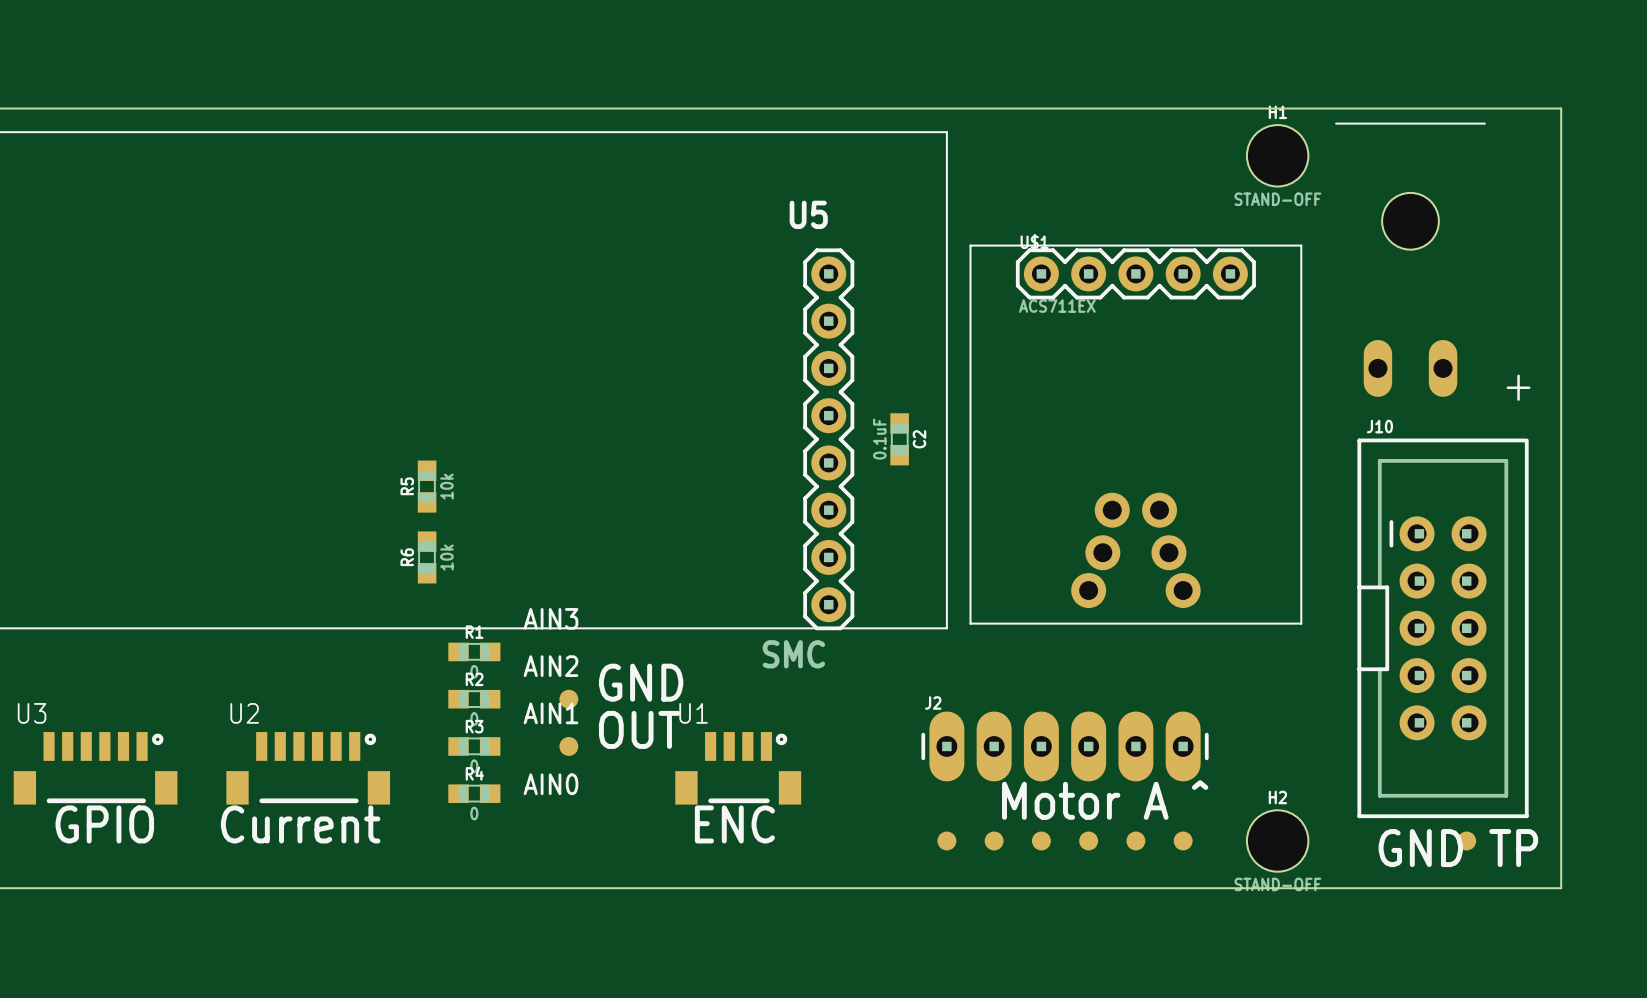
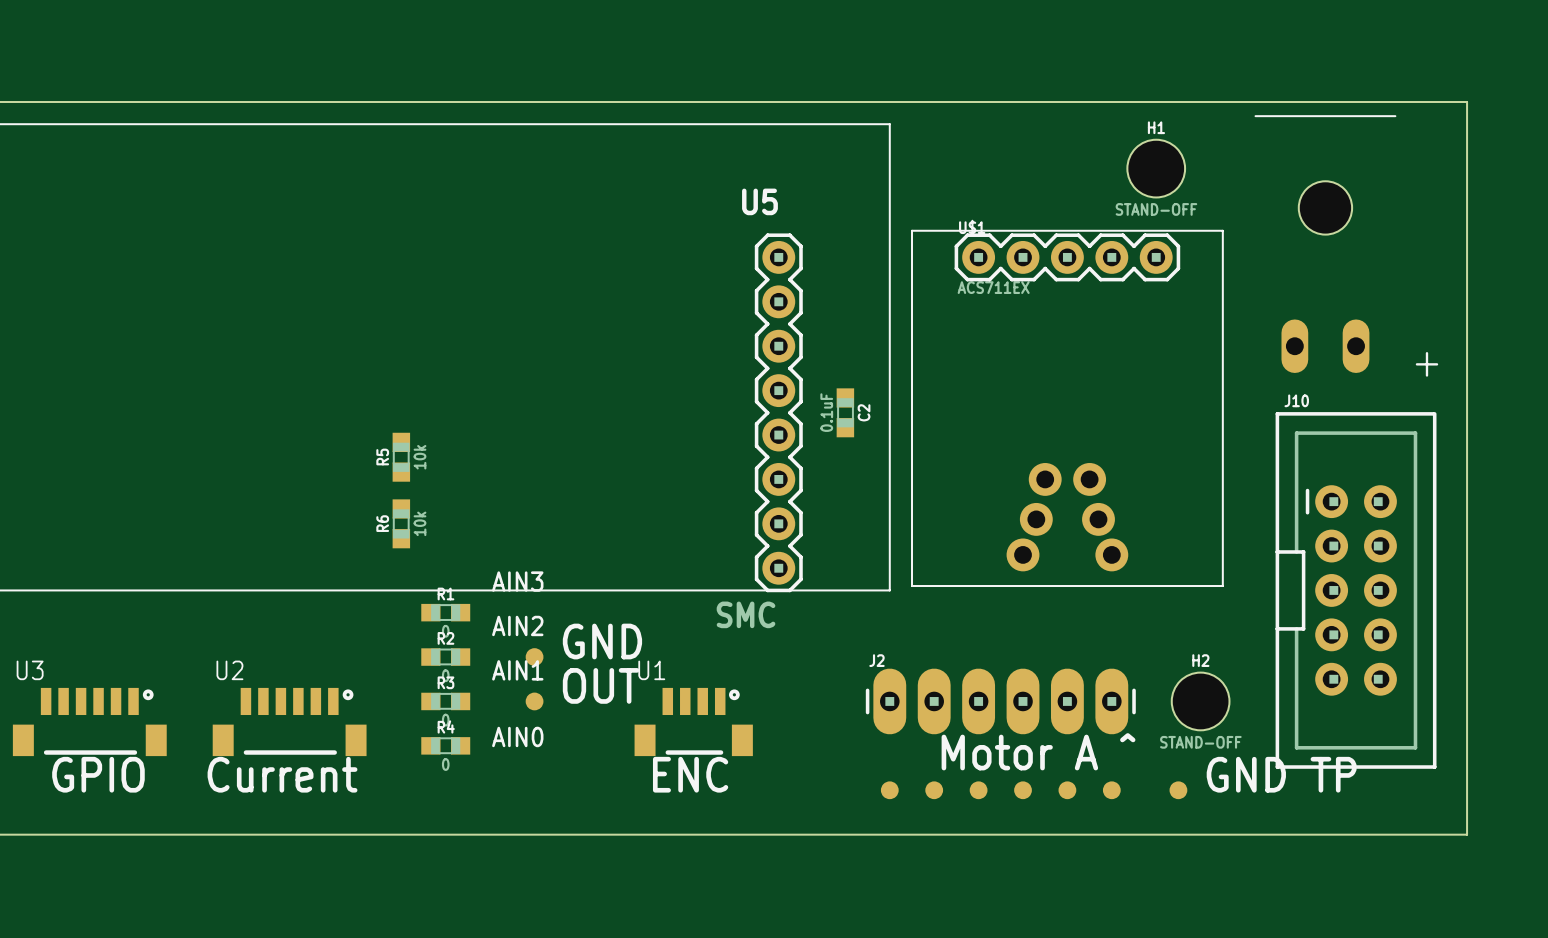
H1 position: (1277, 155) -> (1156, 168)
H2 position: (1277, 840) -> (1200, 701)
part position: (1466, 840) -> (1178, 790)
text position: GND TP (1458, 848) -> GND TP (1281, 774)

